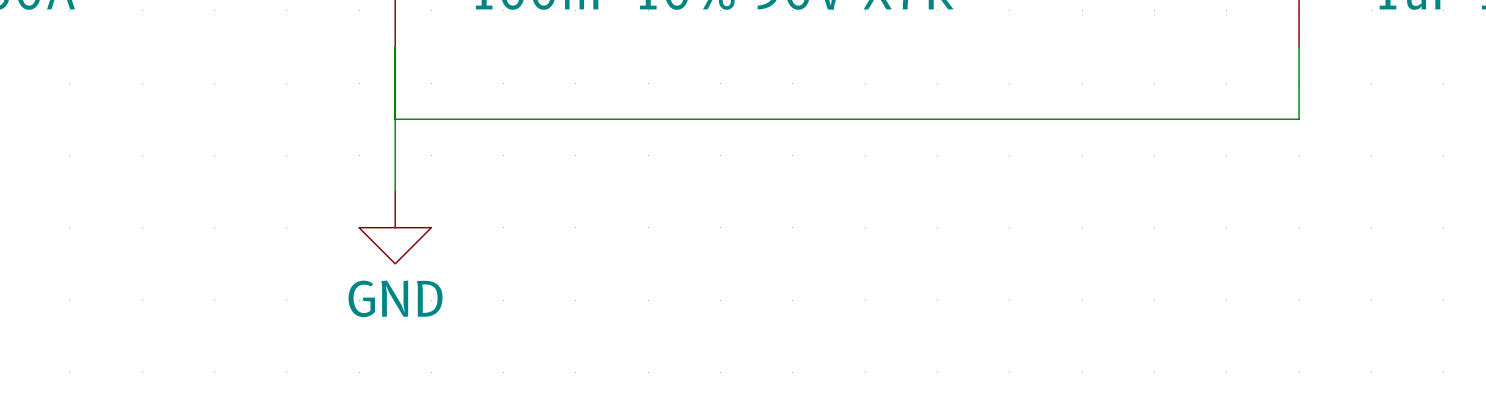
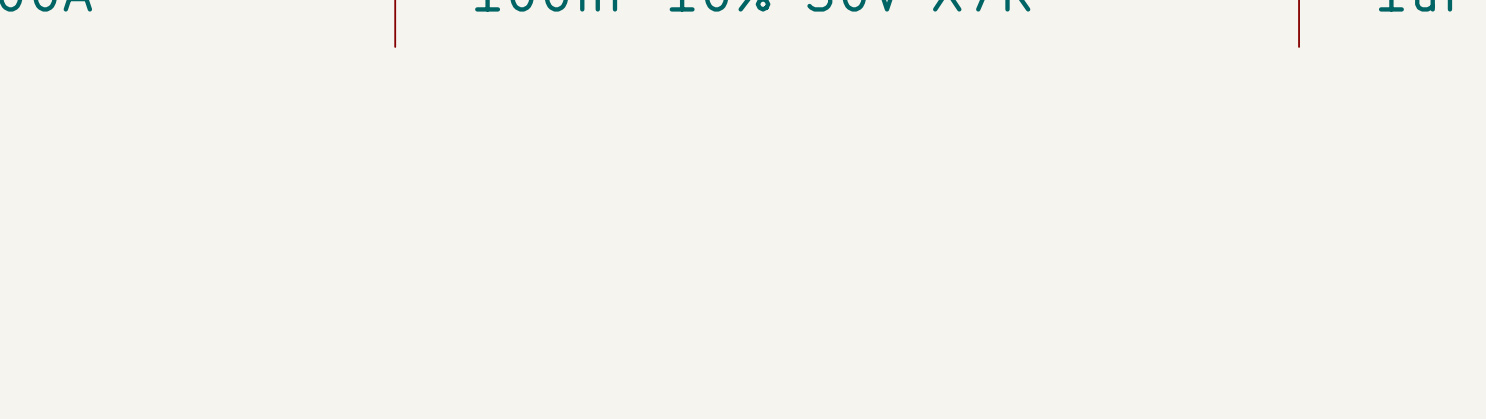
wire: (395, 46) (395, 191) -> none
wire: (1299, 46) (1299, 119) (395, 119) -> none
power symbol: GND (395, 227) -> none

